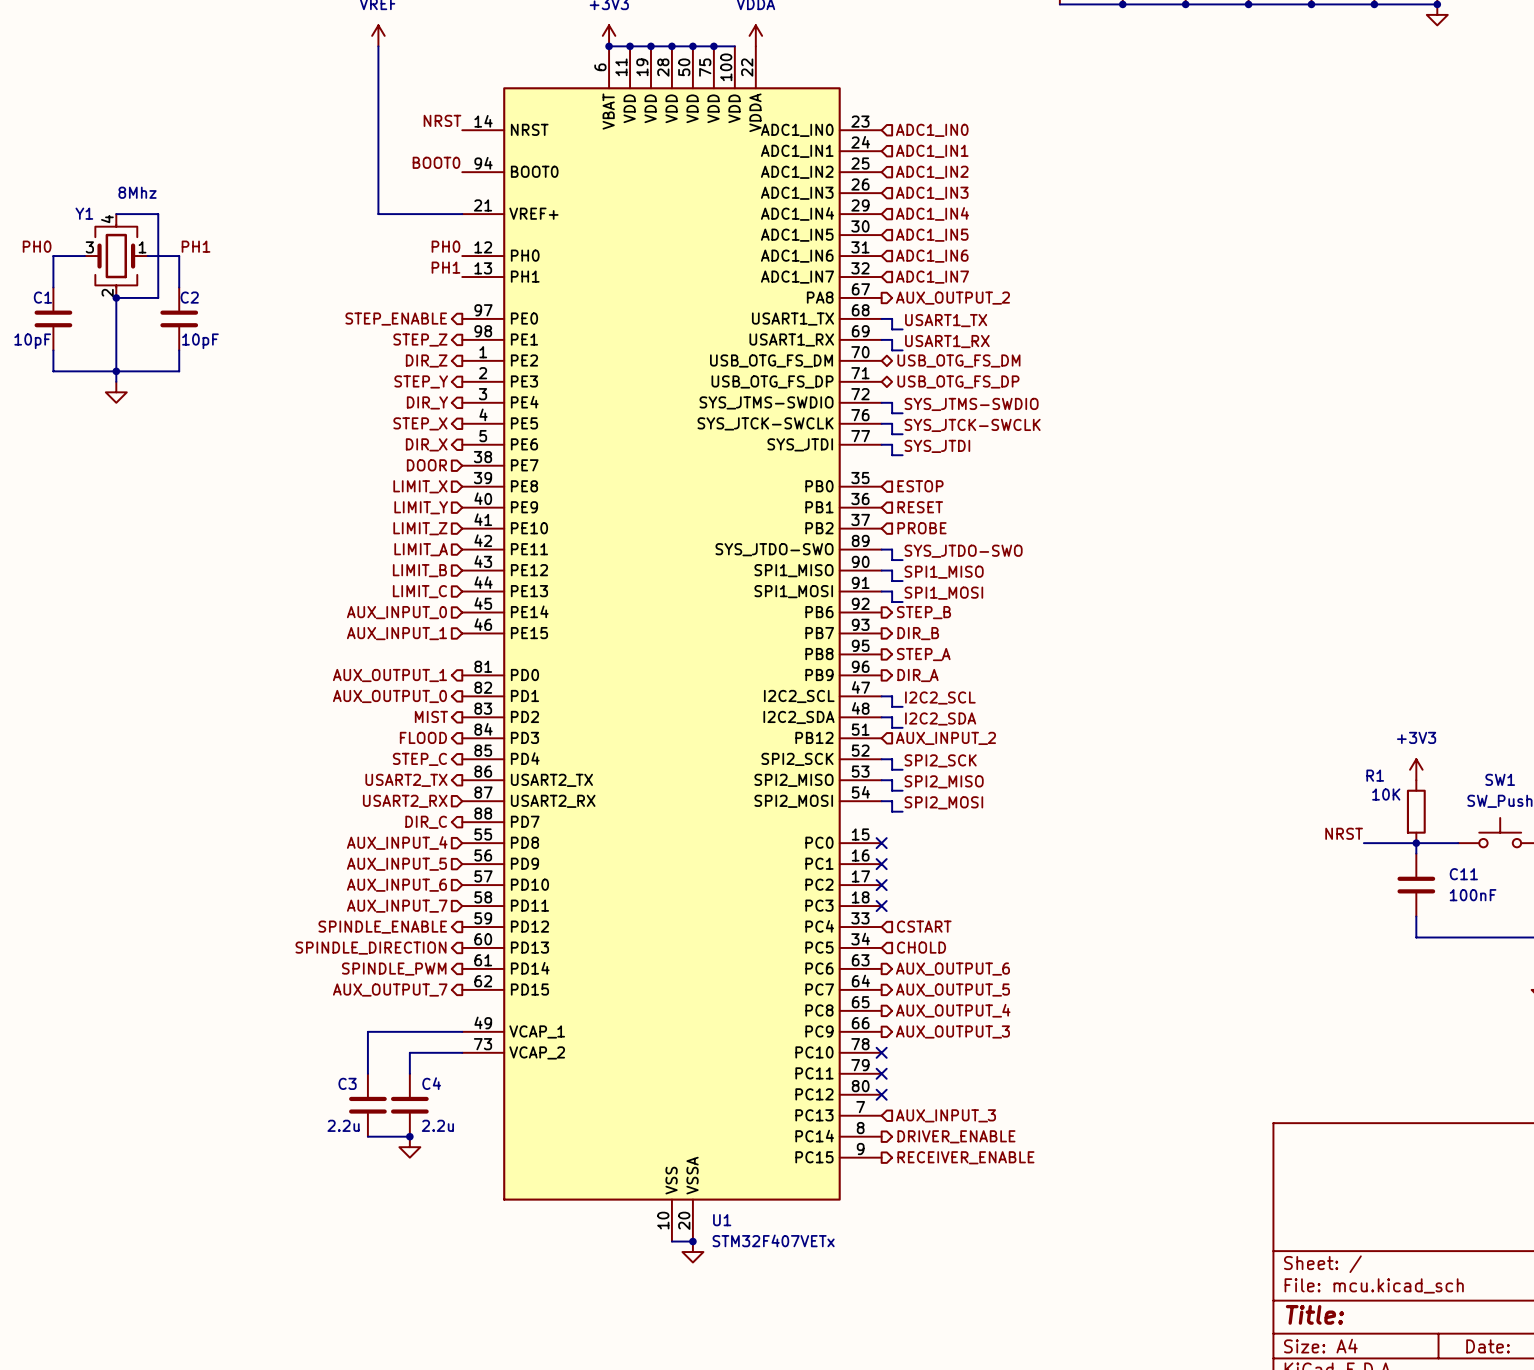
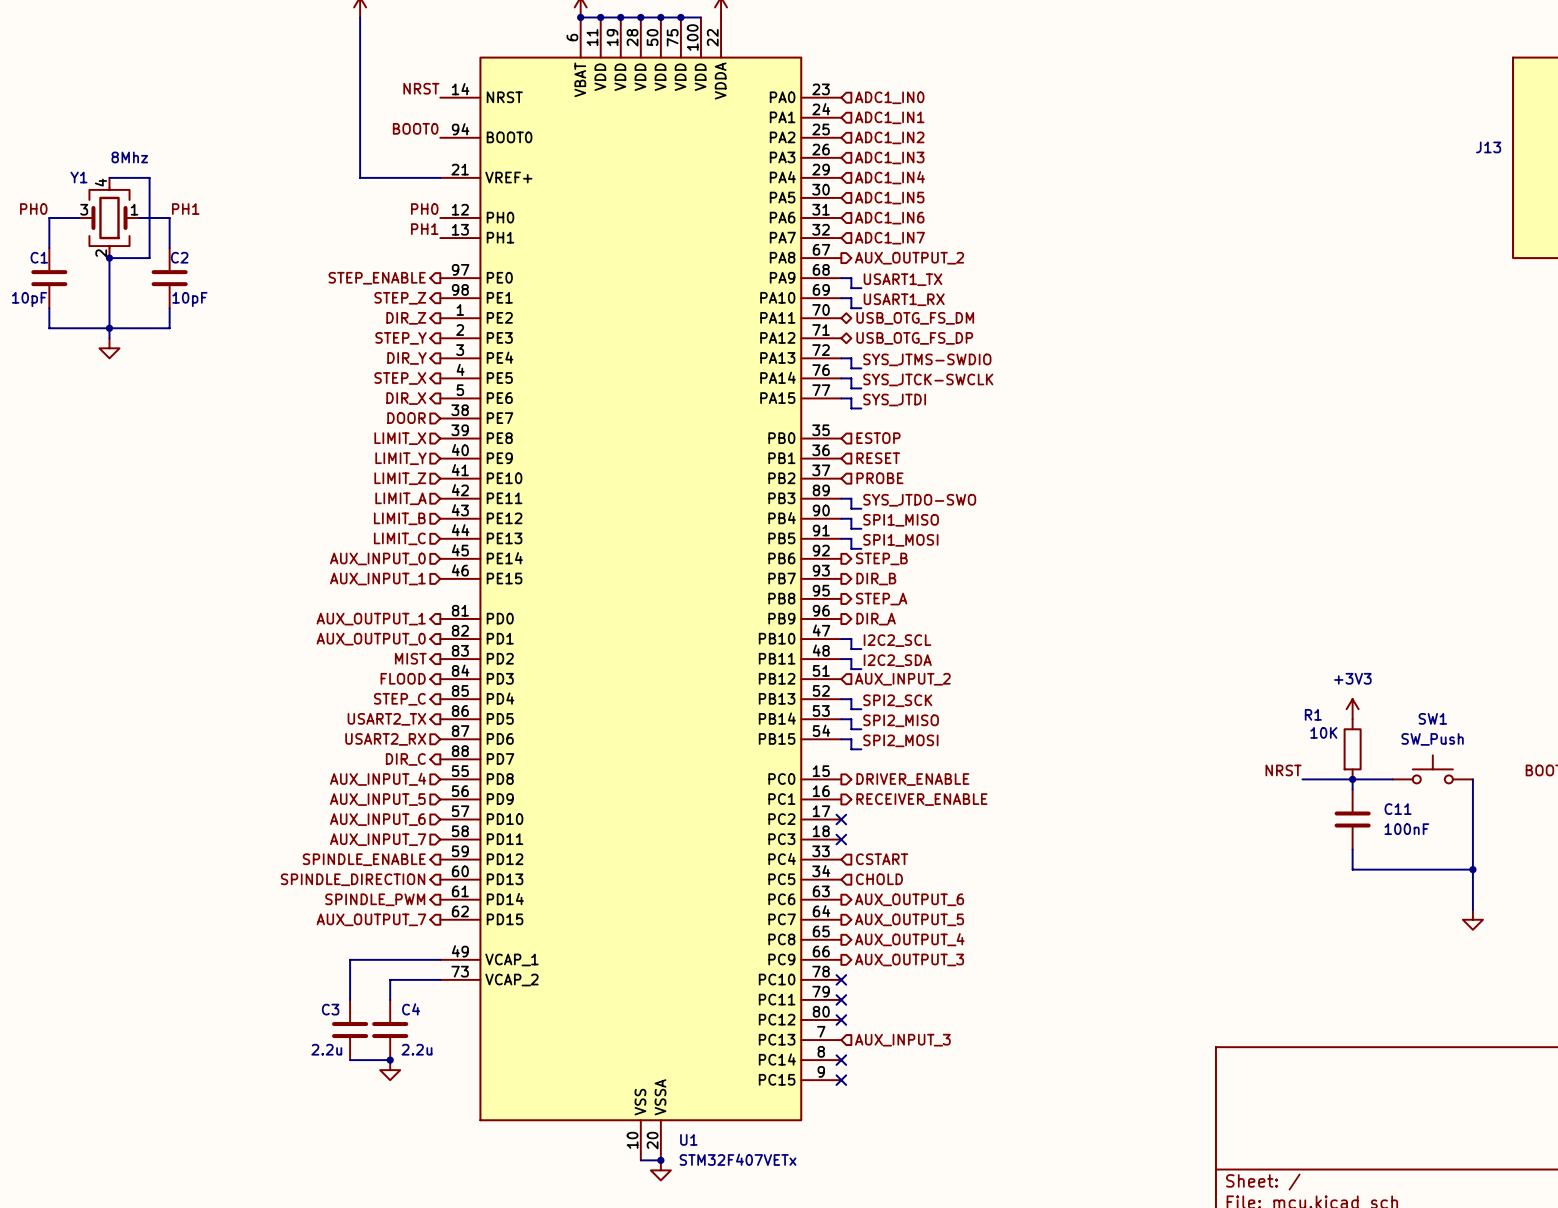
U1 symbol: [462, 46, 882, 1242] -> [440, 17, 842, 1161]
no-connect mark: (881, 843) -> none
hierarchical label: none -> DRIVER_ENABLE (912, 779)
no-connect mark: (881, 864) -> none
hierarchical label: none -> RECEIVER_ENABLE (921, 799)
no-connect mark: none -> (841, 1060)
hierarchical label: DRIVER_ENABLE (956, 1136) -> none
no-connect mark: none -> (841, 1080)
hierarchical label: RECEIVER_ENABLE (965, 1157) -> none

